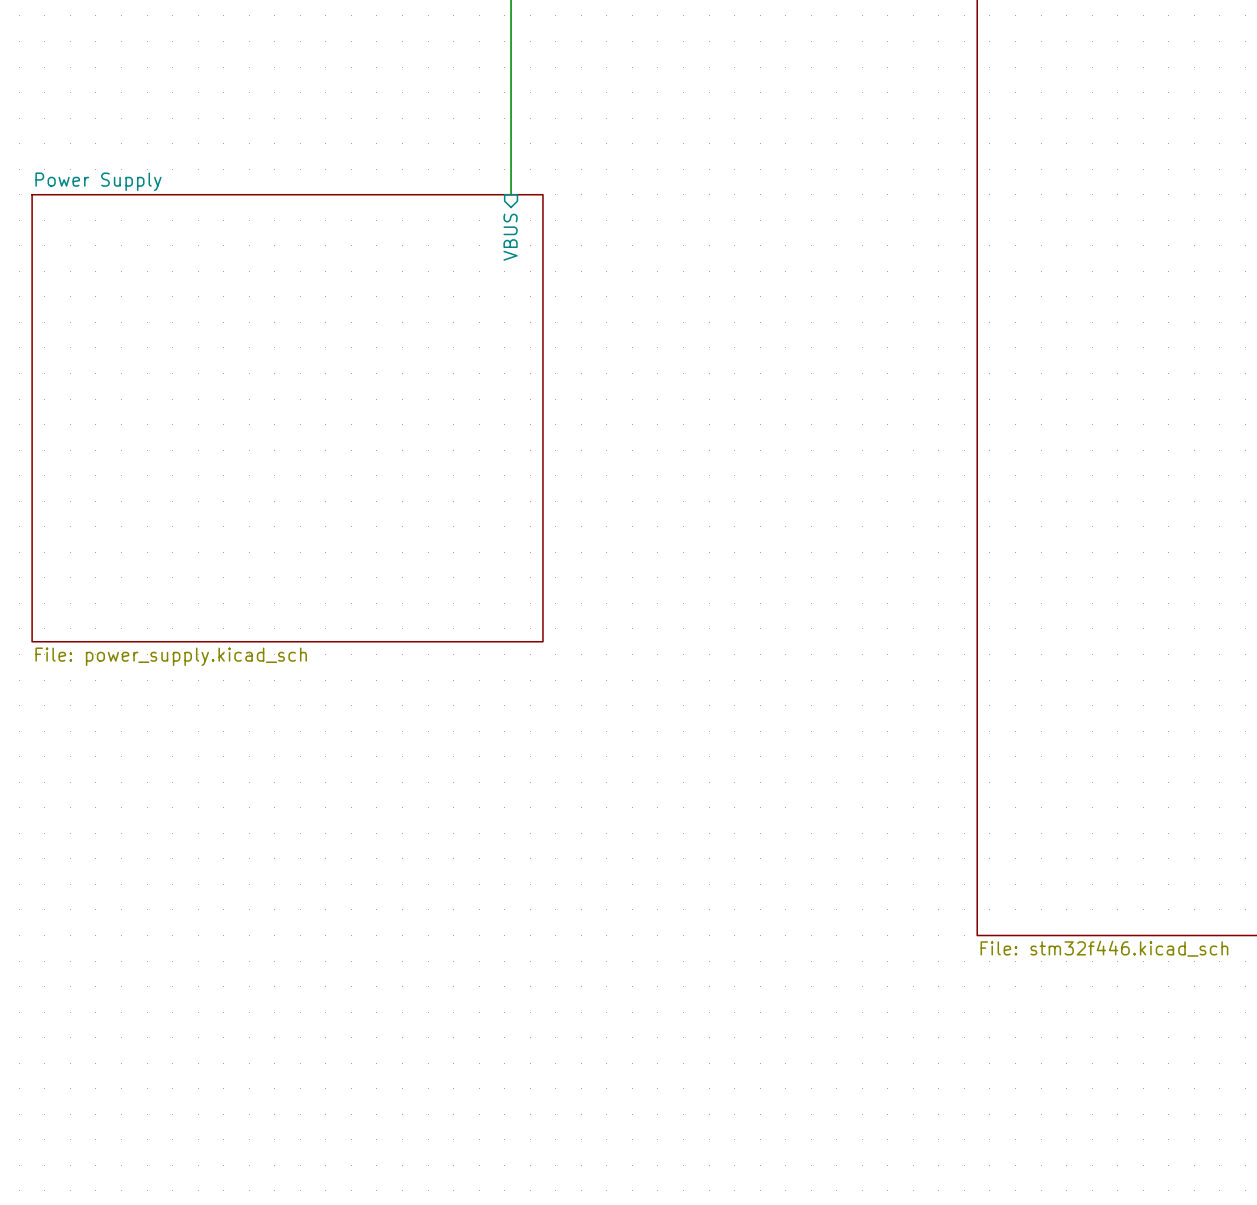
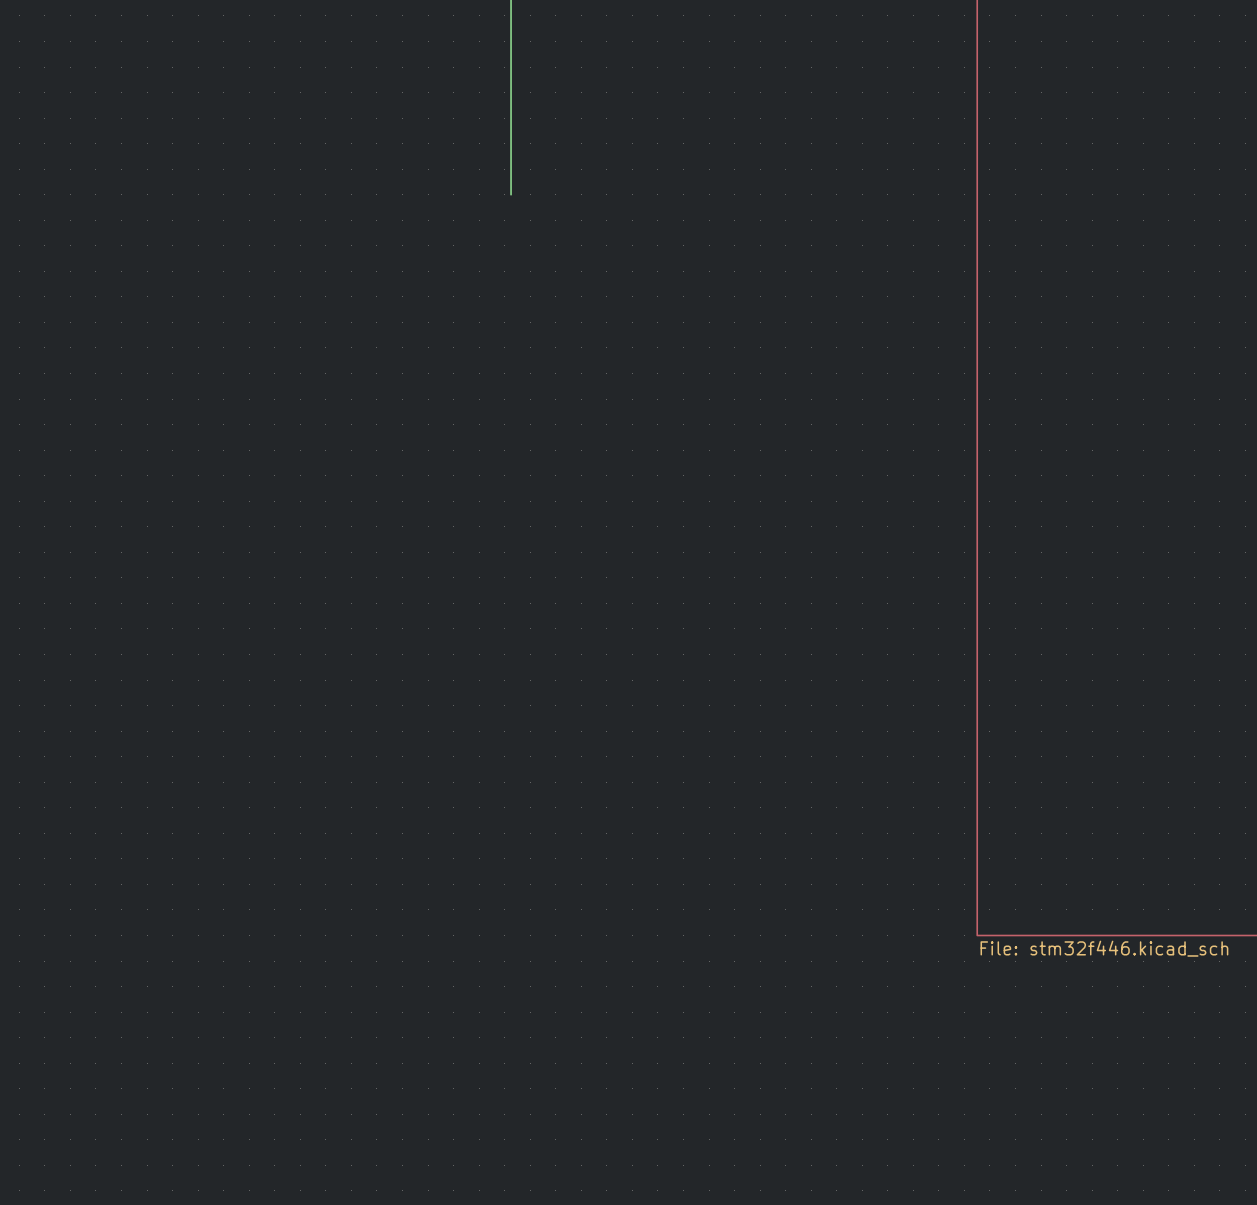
sheet pin: VBUS (510, 237) -> none
sheet Power Supply: File: power_supply.kicad_sch (287, 418) -> none

